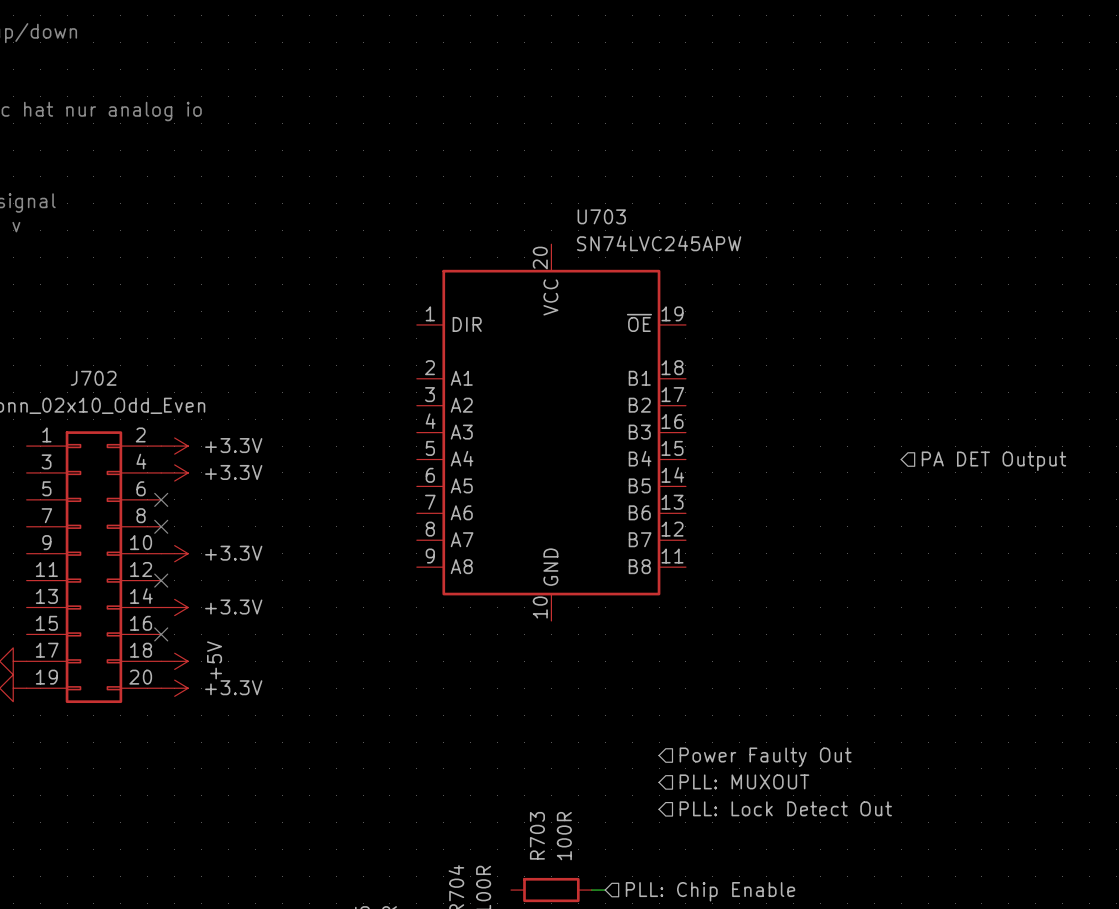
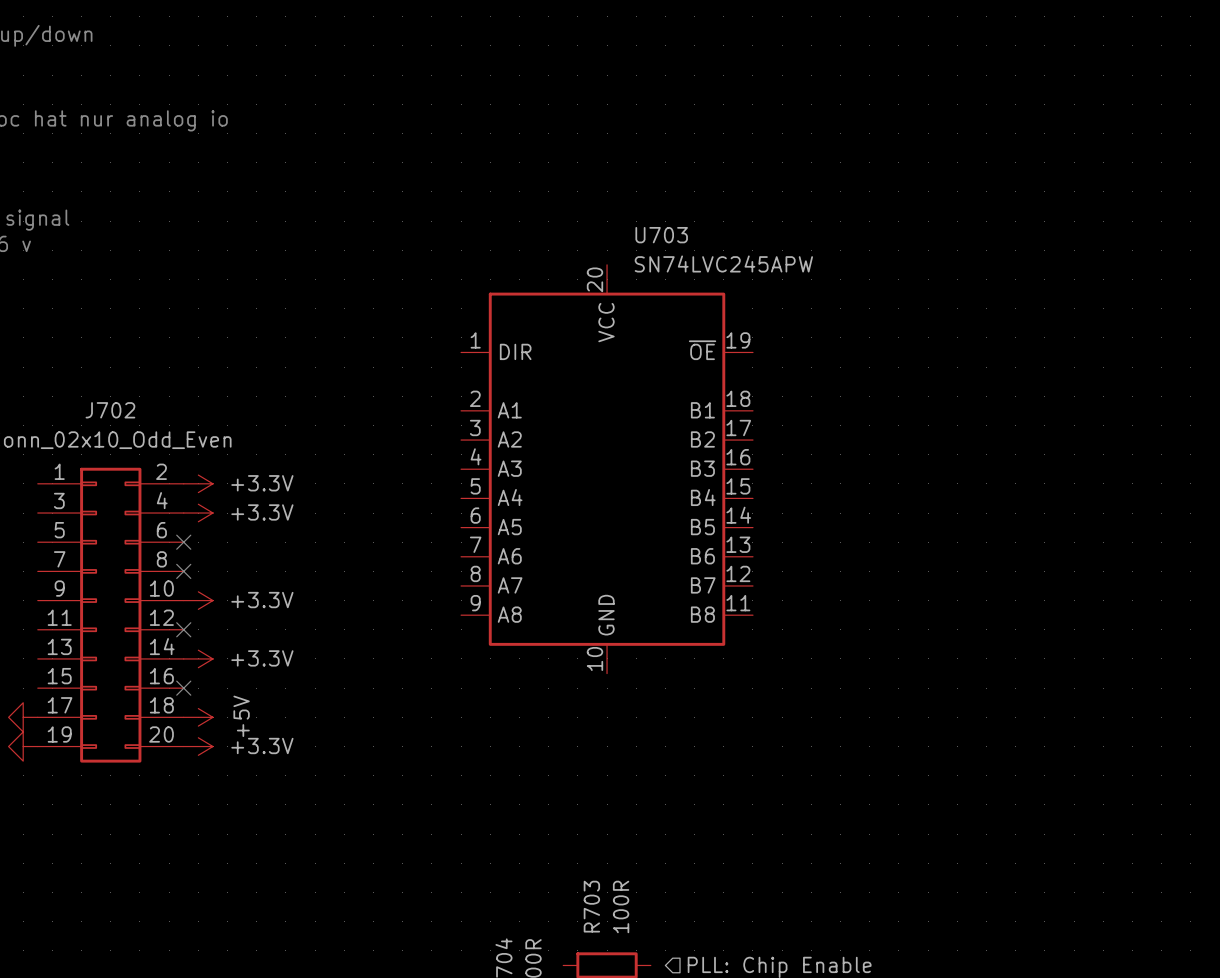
hierarchical label: PA DET Output (993, 461) -> none
hierarchical label: Power Faulty Out (765, 757) -> none
hierarchical label: PLL: MUXOUT (744, 781) -> none
hierarchical label: PLL: Lock Detect Out (785, 808) -> none
wire: (591, 890) (605, 890) -> none

